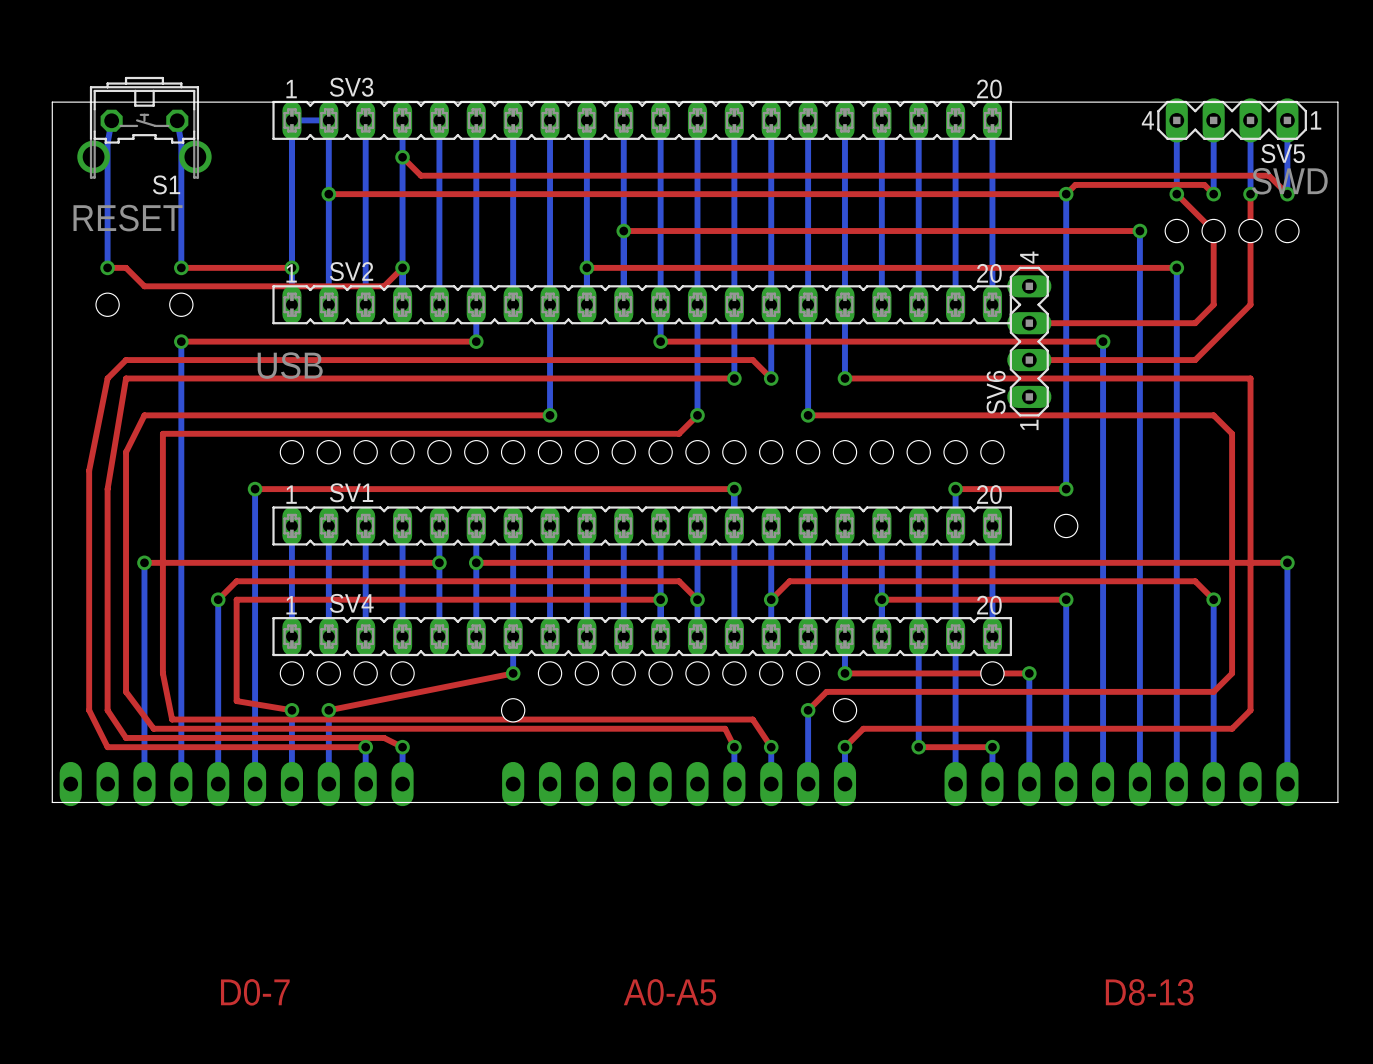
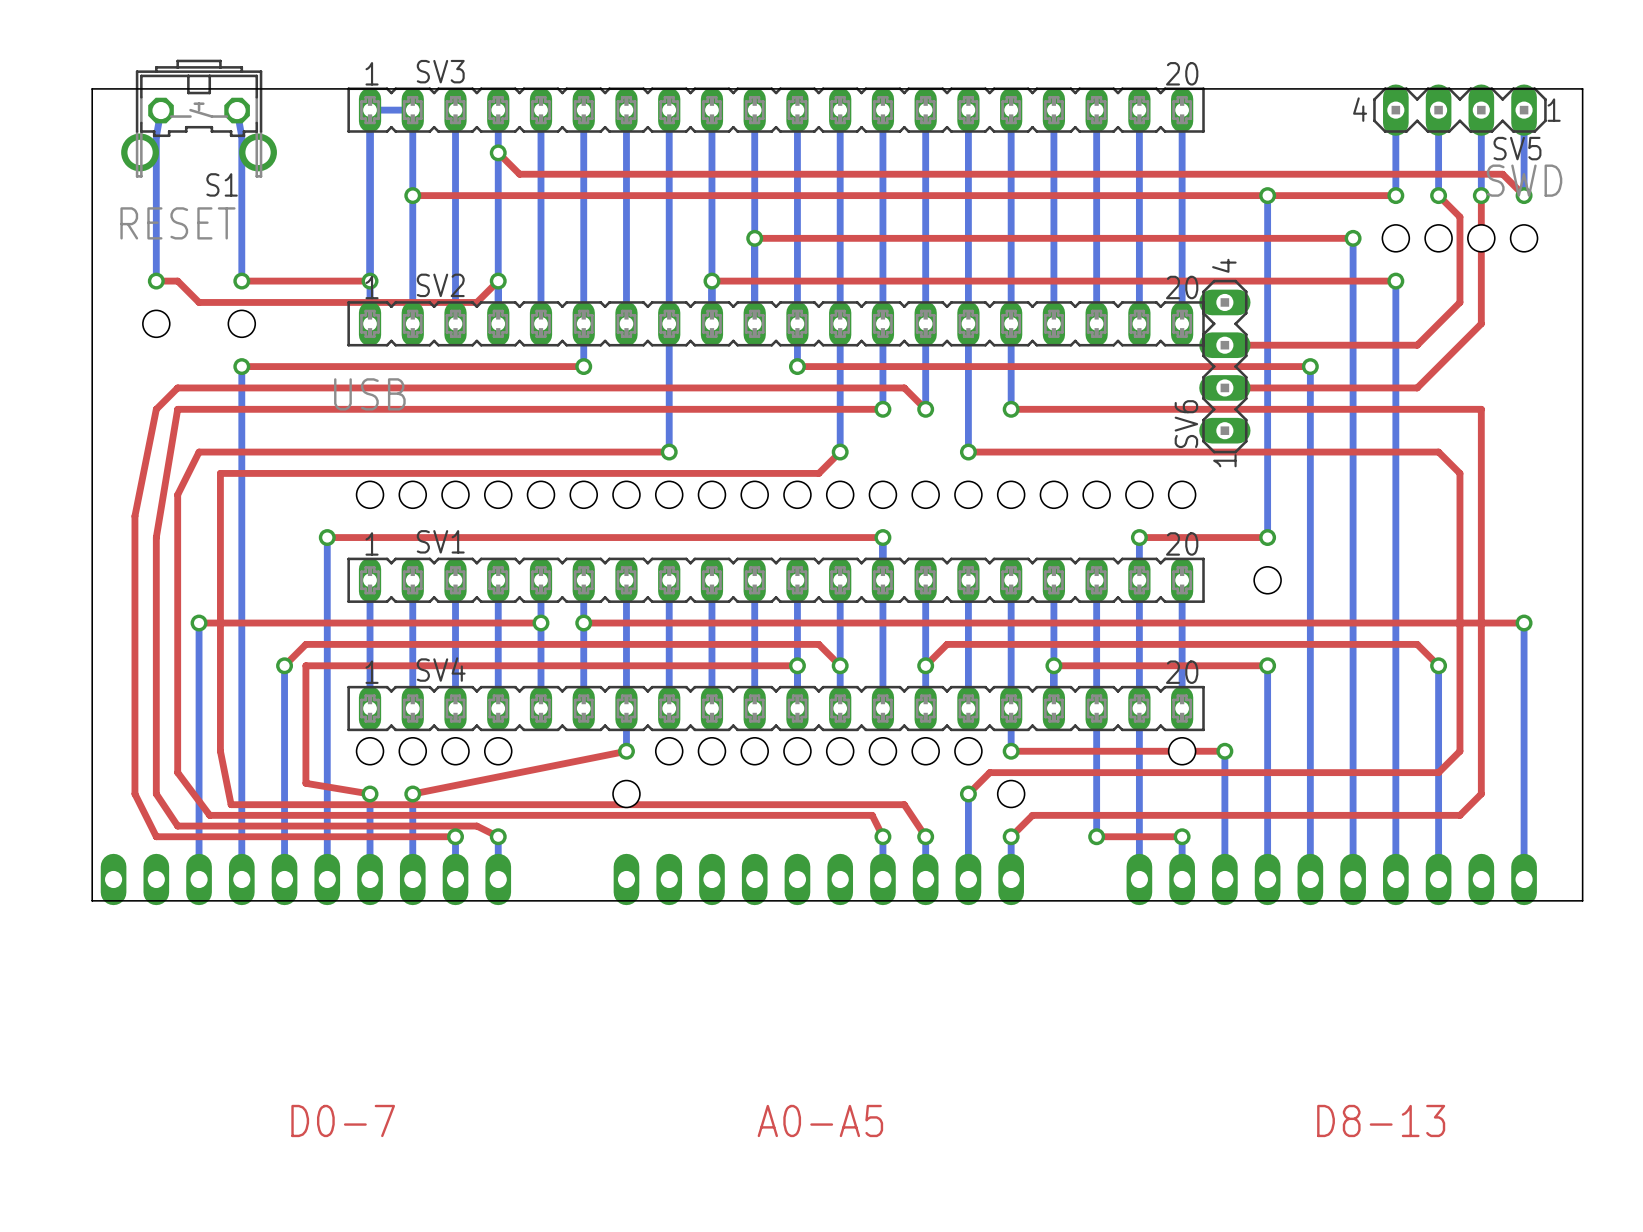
top track: (1066, 194) (1075, 184) (1204, 184) (1213, 194) -> (1267, 195) (1395, 195)
top track: (1176, 194) (1213, 231) (1213, 304) -> (1438, 195) (1459, 216) (1459, 302) (1438, 323)

